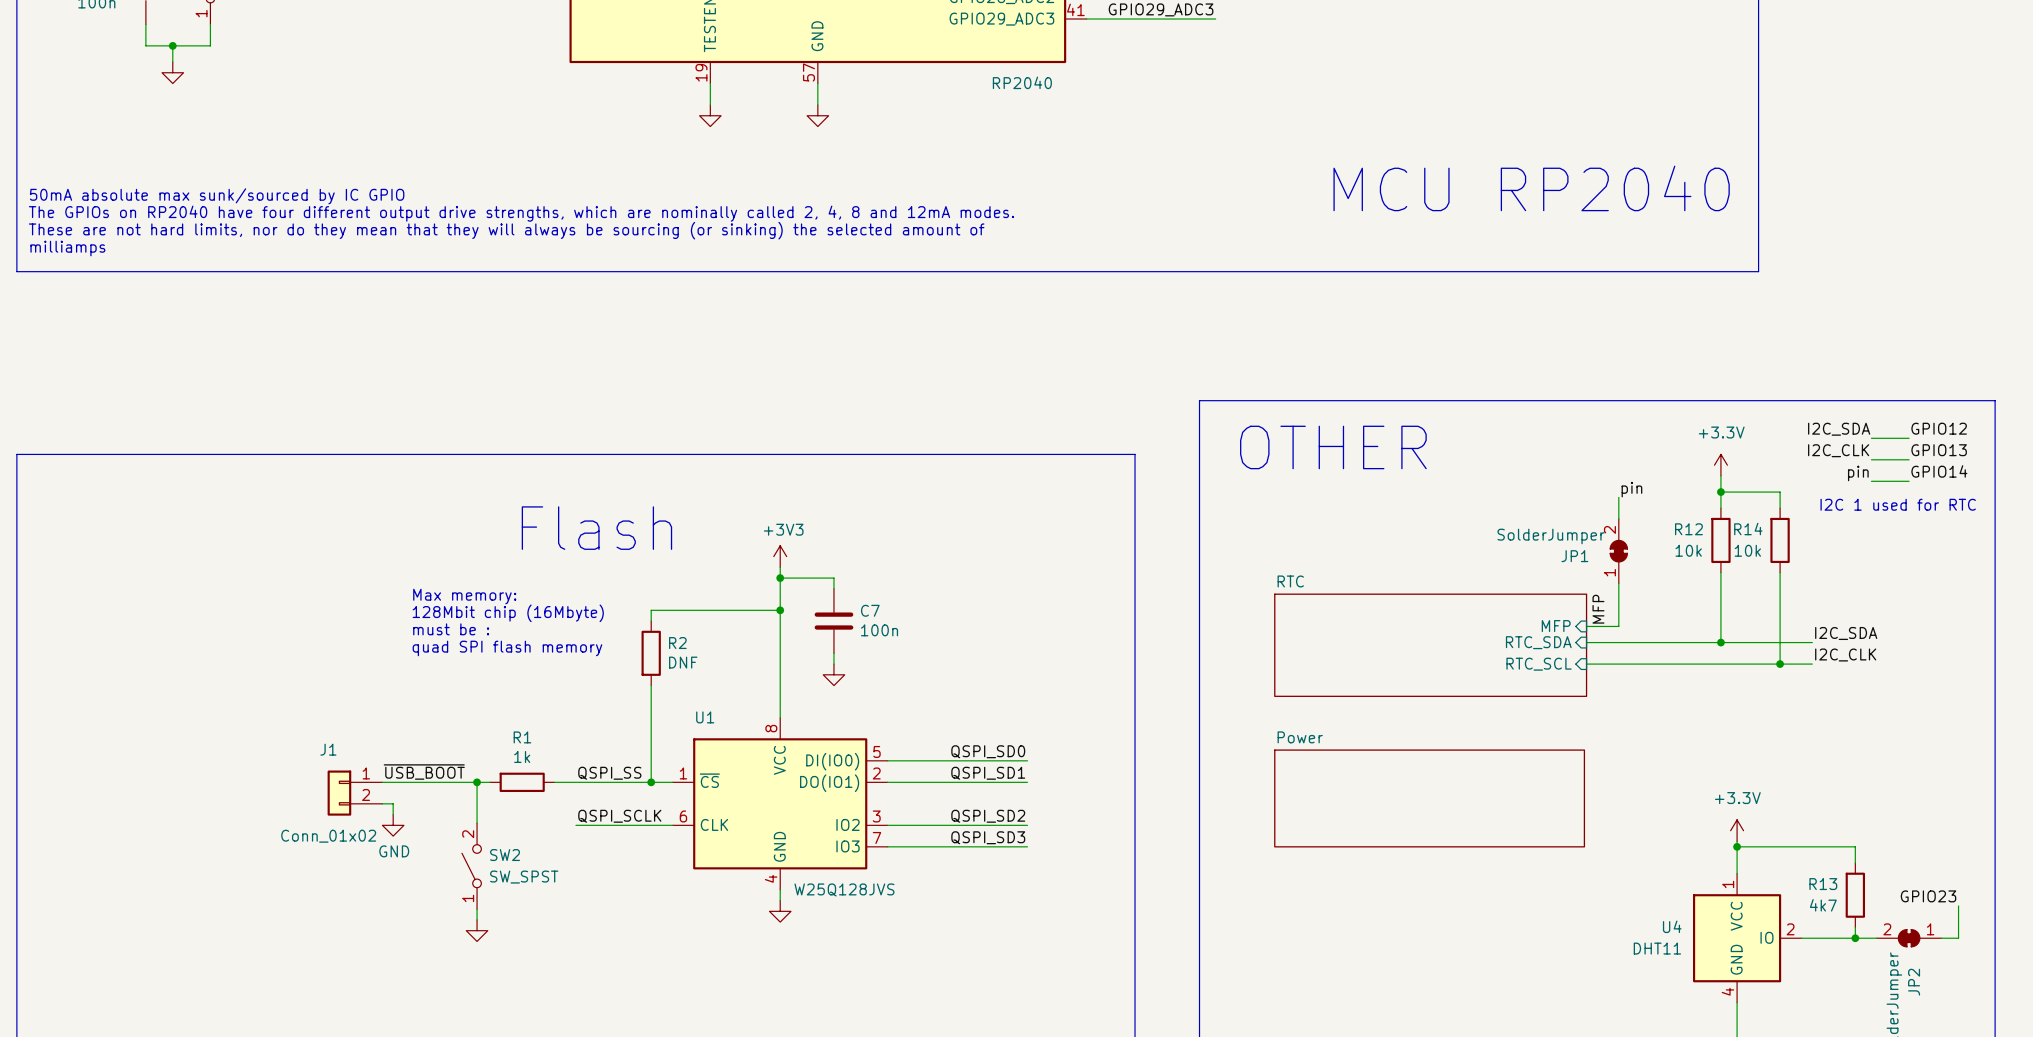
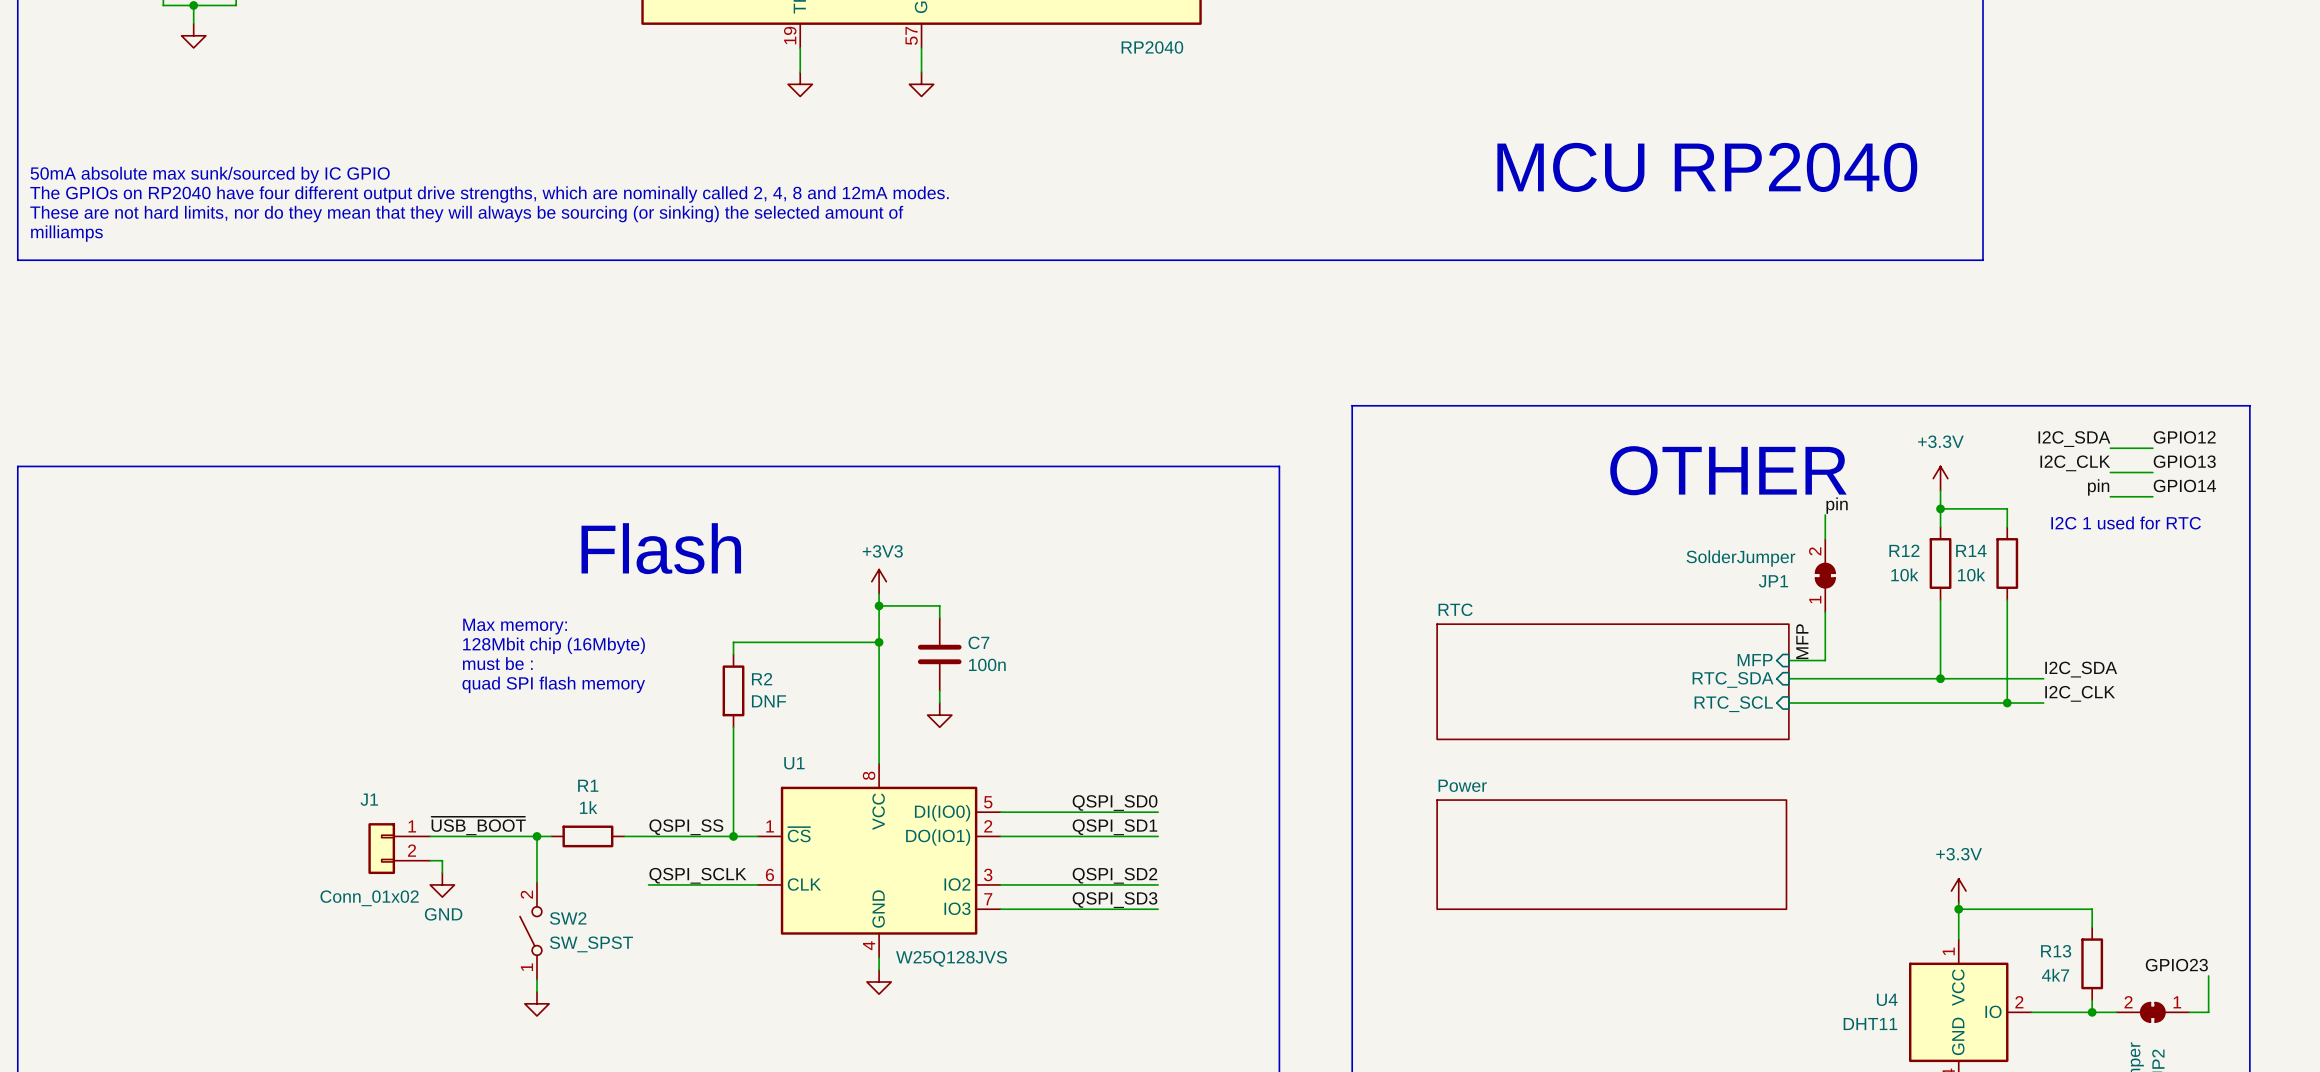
text position: OTHER (1333, 447) -> OTHER (1728, 470)

